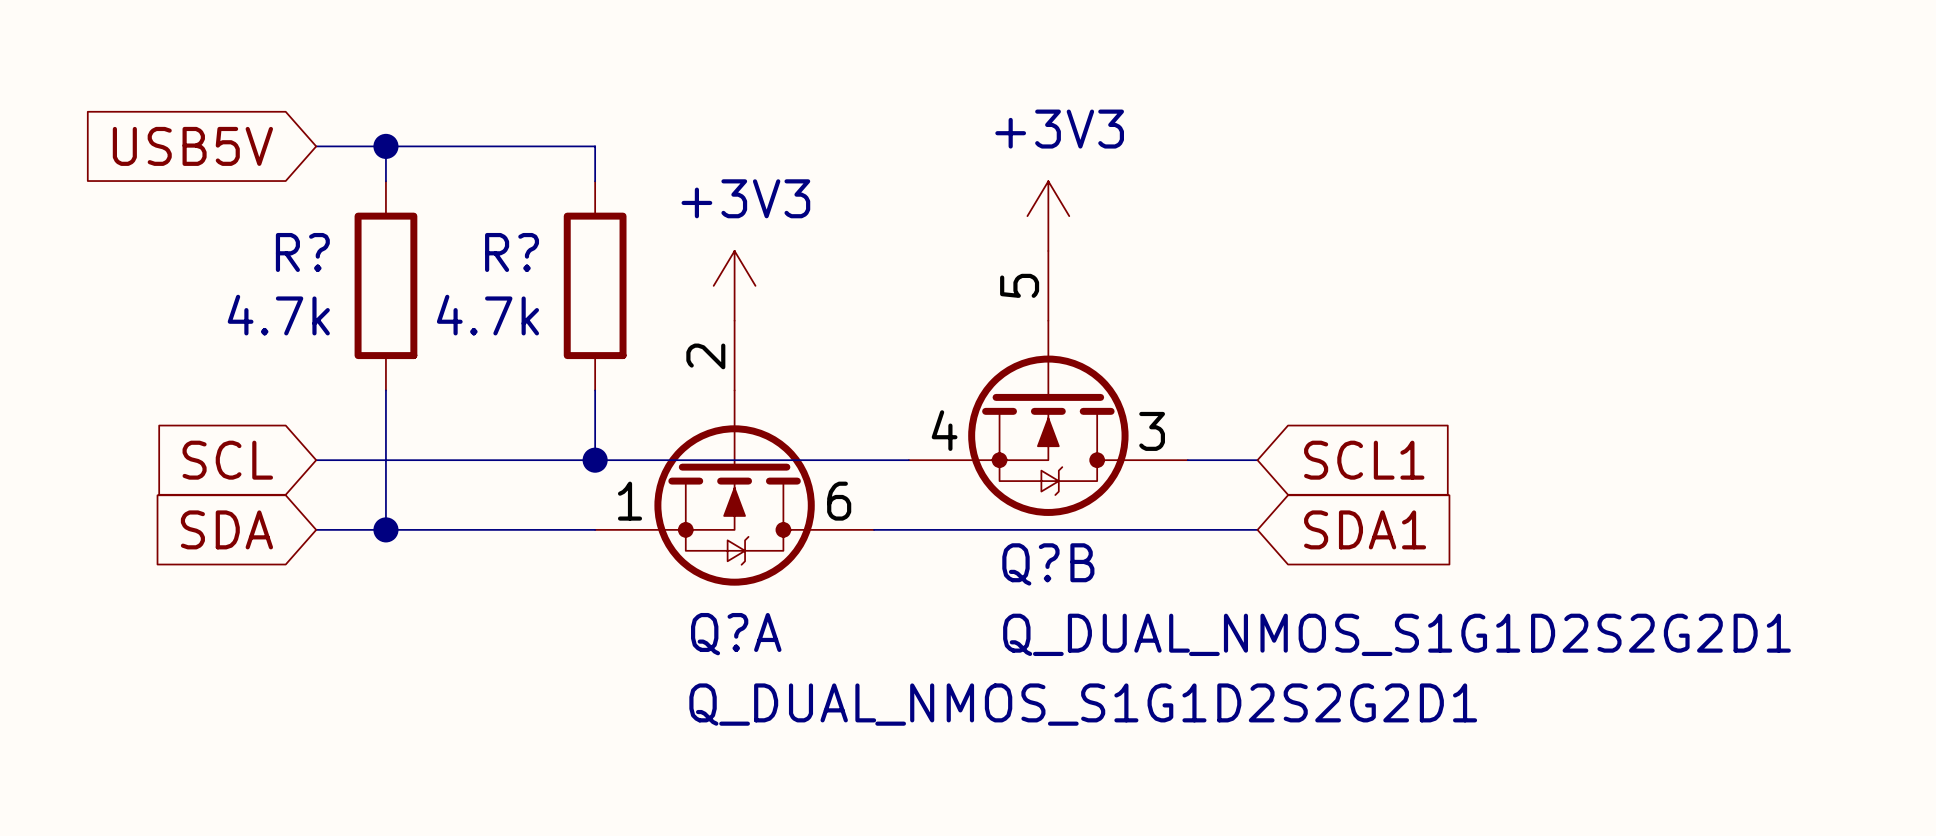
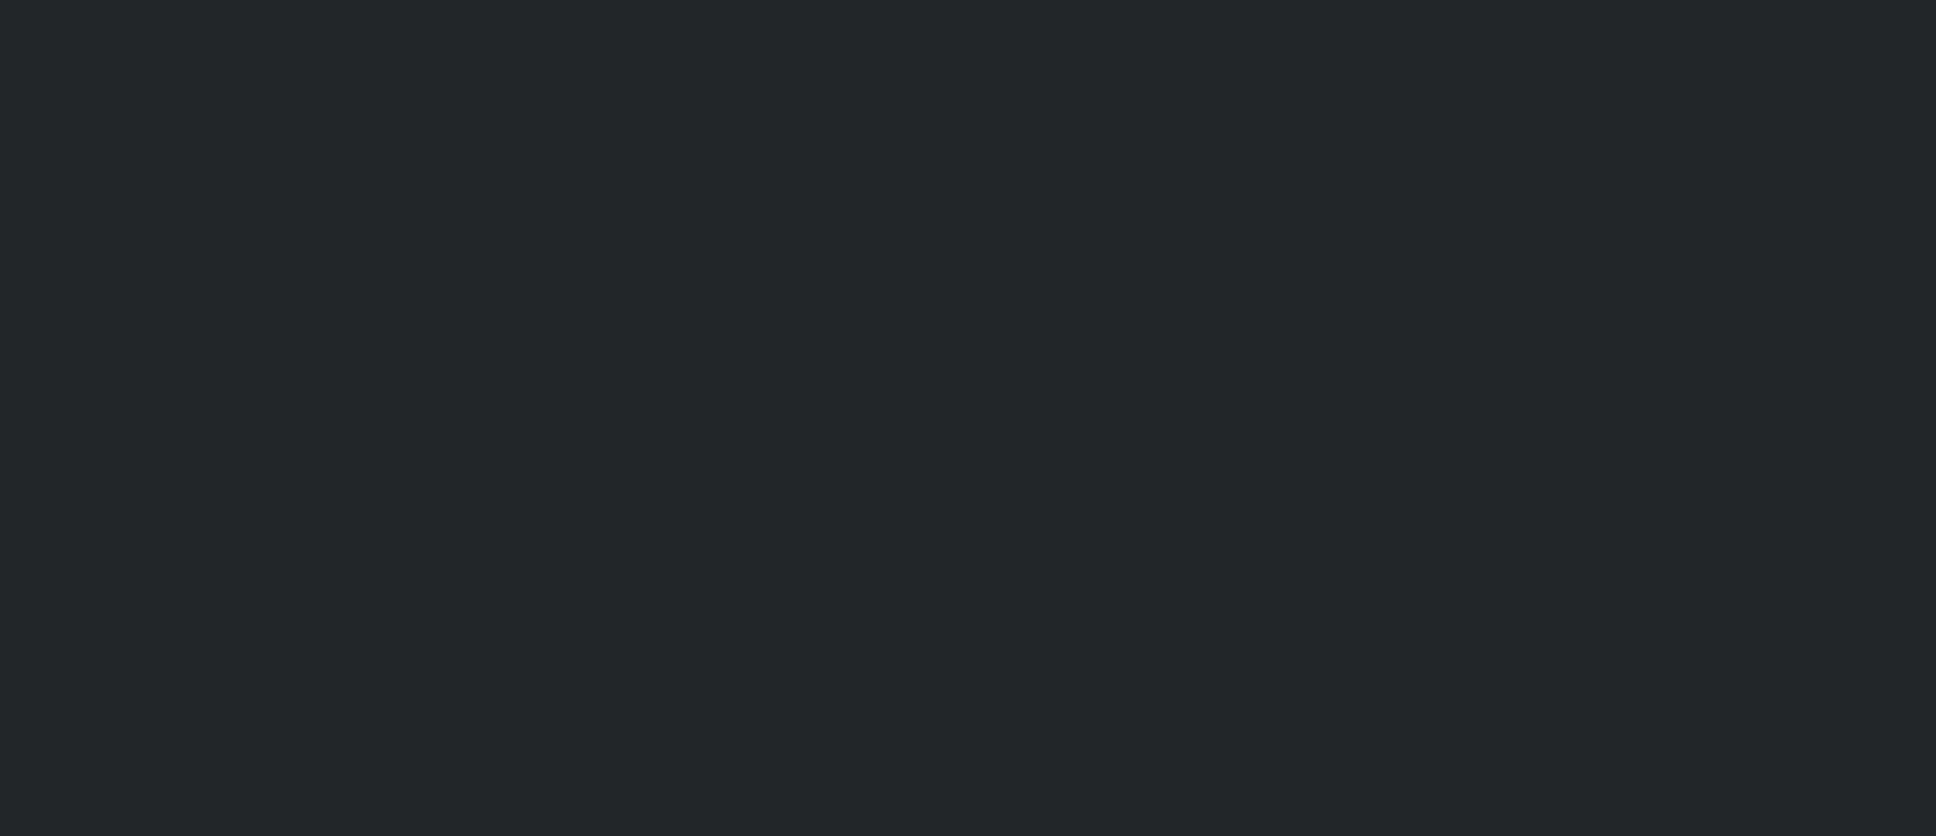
global label: USB5V (192, 146) -> none
wire: (316, 146) (595, 146) (595, 181) -> none
wire: (385, 146) (385, 181) -> none
junction: (385, 146) -> none
power symbol: +3V3 (1048, 216) -> none
R?: 4.7k (385, 285) -> none
R?: 4.7k (595, 285) -> none
power symbol: +3V3 (734, 285) -> none
Q?B: Q_DUAL_NMOS_S1G1D2S2G2D1 (1048, 383) -> none
wire: (385, 390) (385, 529) -> none
wire: (595, 390) (595, 460) -> none
Q?A: Q_DUAL_NMOS_S1G1D2S2G2D1 (734, 453) -> none
global label: SCL (227, 460) -> none
wire: (316, 460) (908, 460) -> none
junction: (595, 460) -> none
wire: (1187, 460) (1257, 460) -> none
global label: SCL1 (1364, 460) -> none
global label: SDA (226, 529) -> none
wire: (316, 529) (595, 529) -> none
junction: (385, 529) -> none
wire: (874, 529) (1257, 529) -> none
global label: SDA1 (1365, 529) -> none

